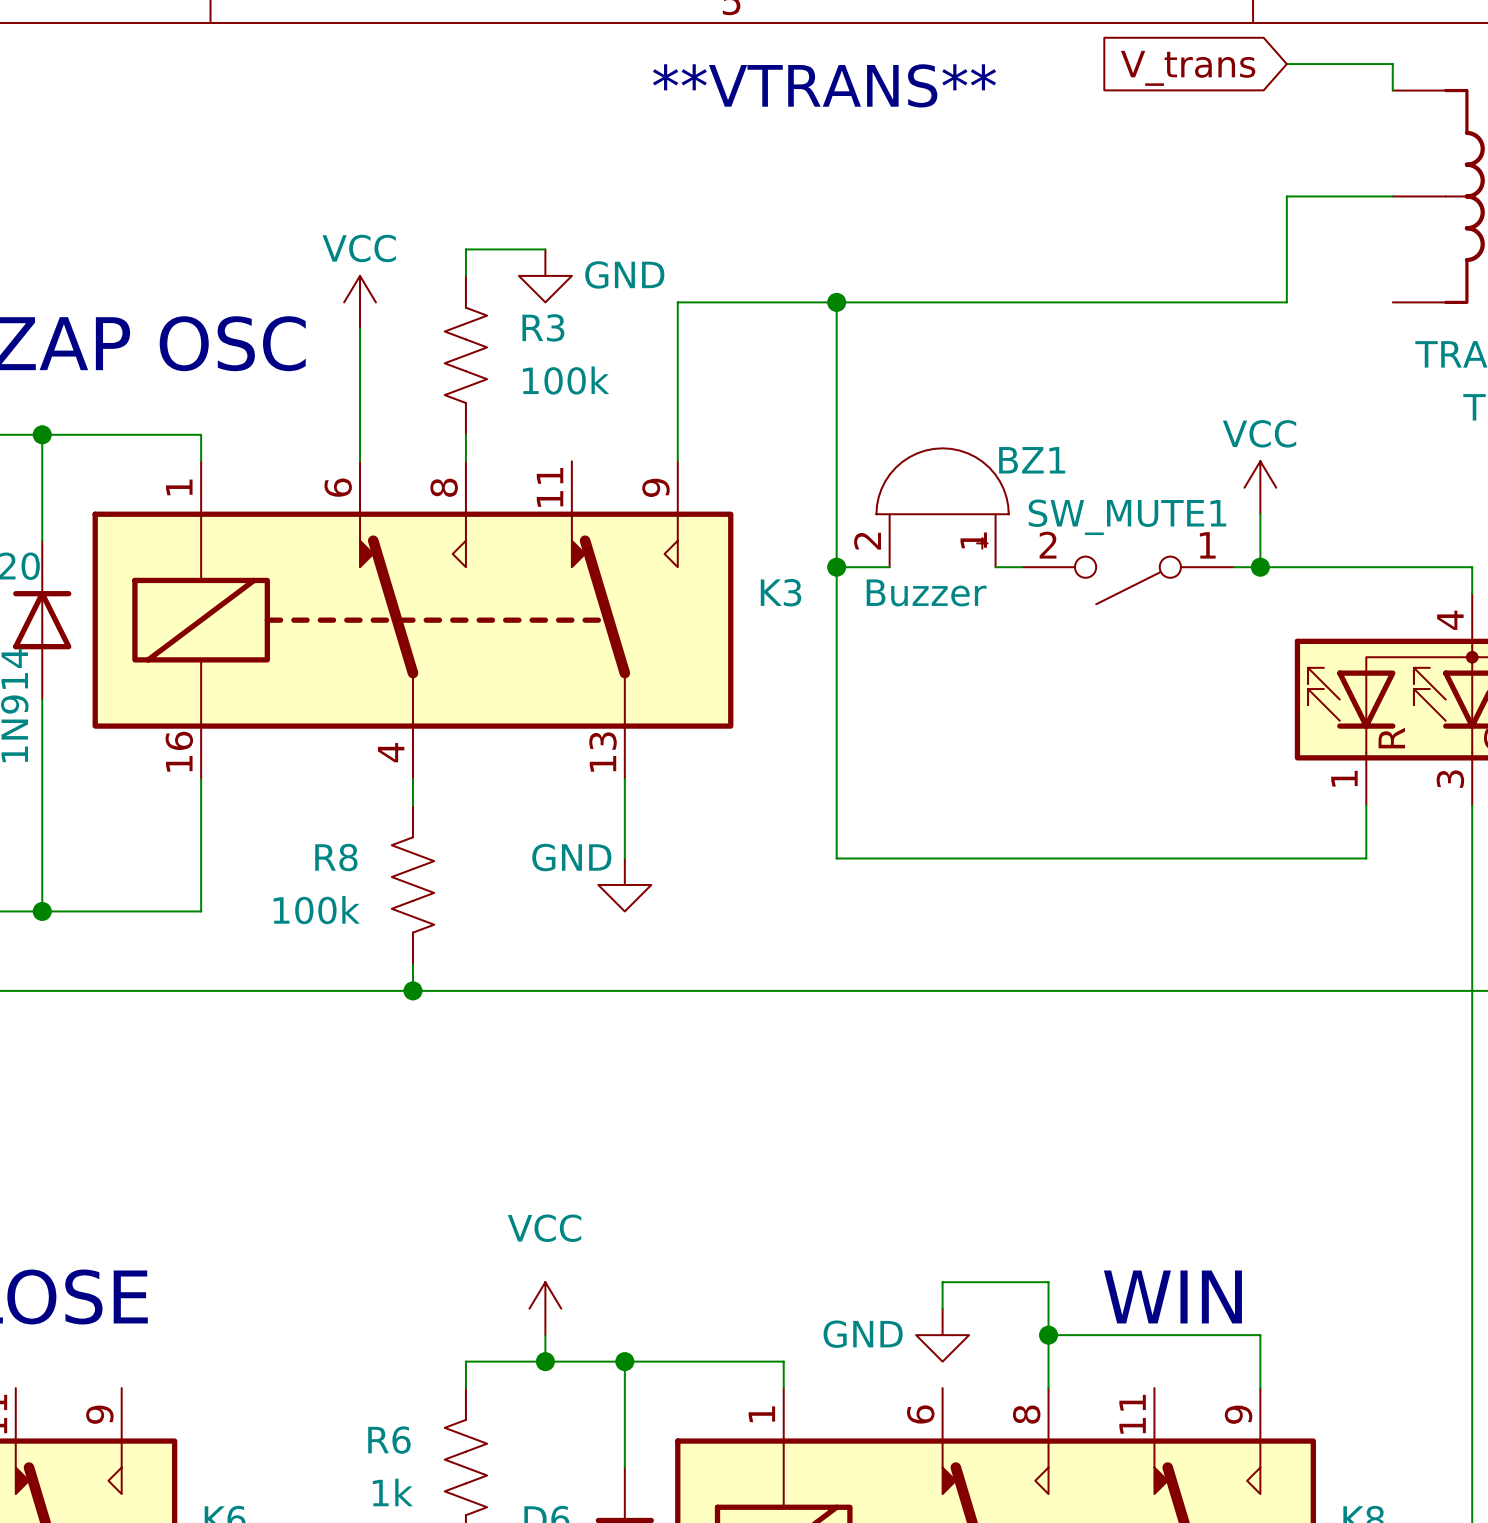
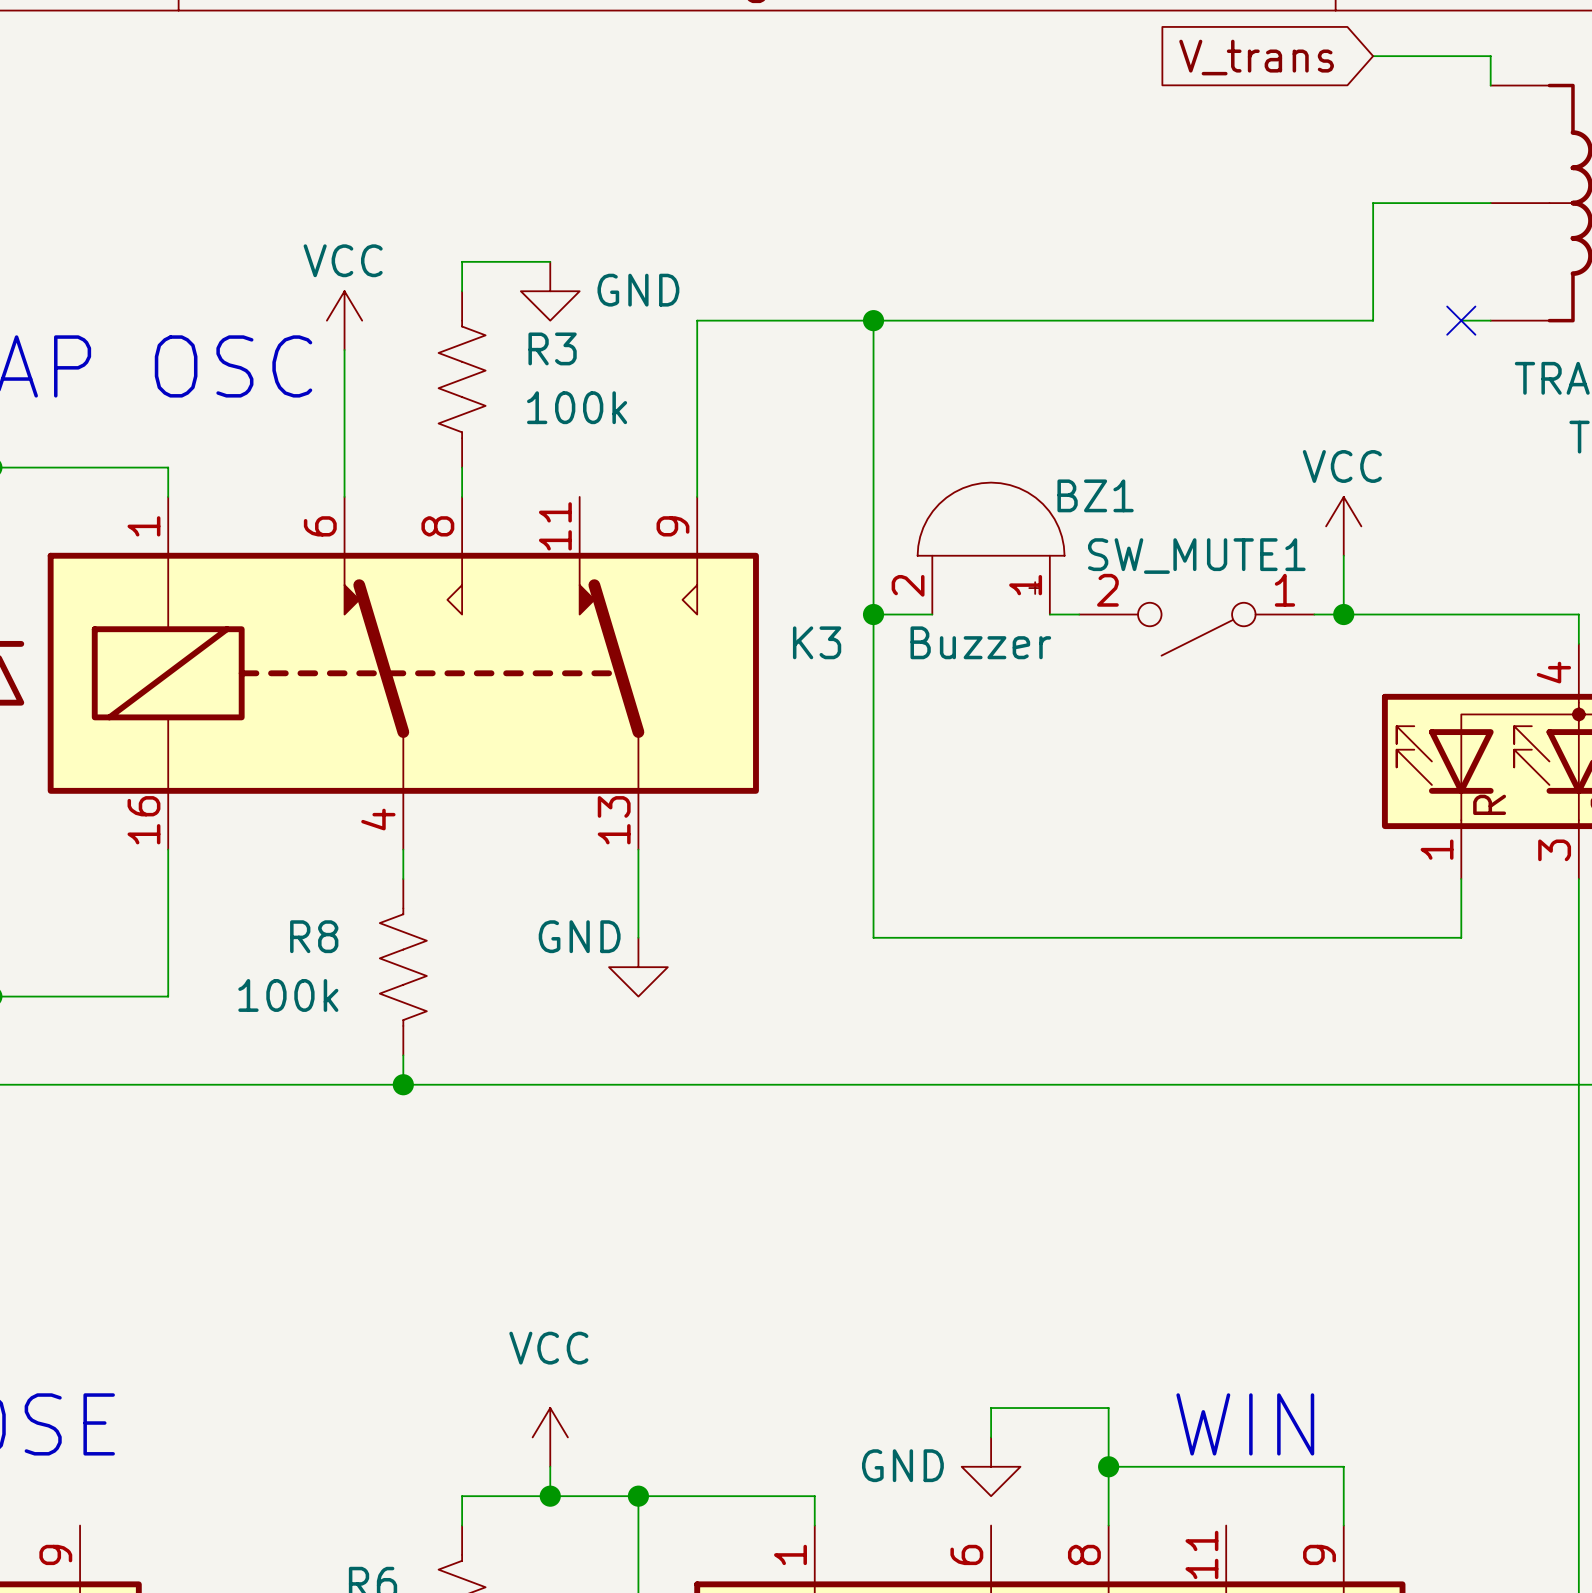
text: **VTRANS** (824, 85) -> none
wire: none -> (1461, 320) (1490, 320)
no-connect mark: none -> (1461, 320)

